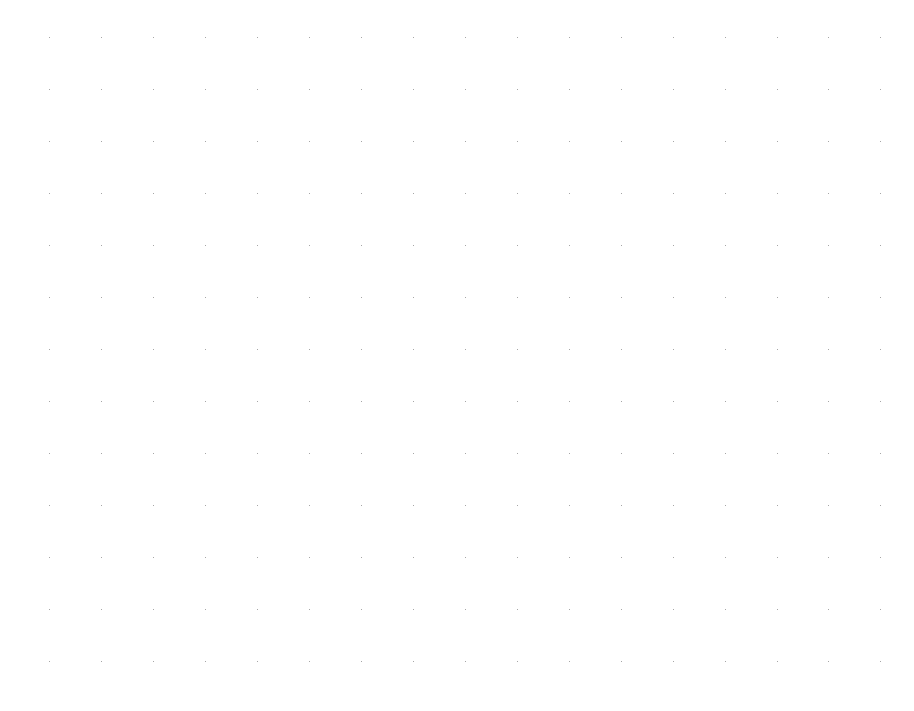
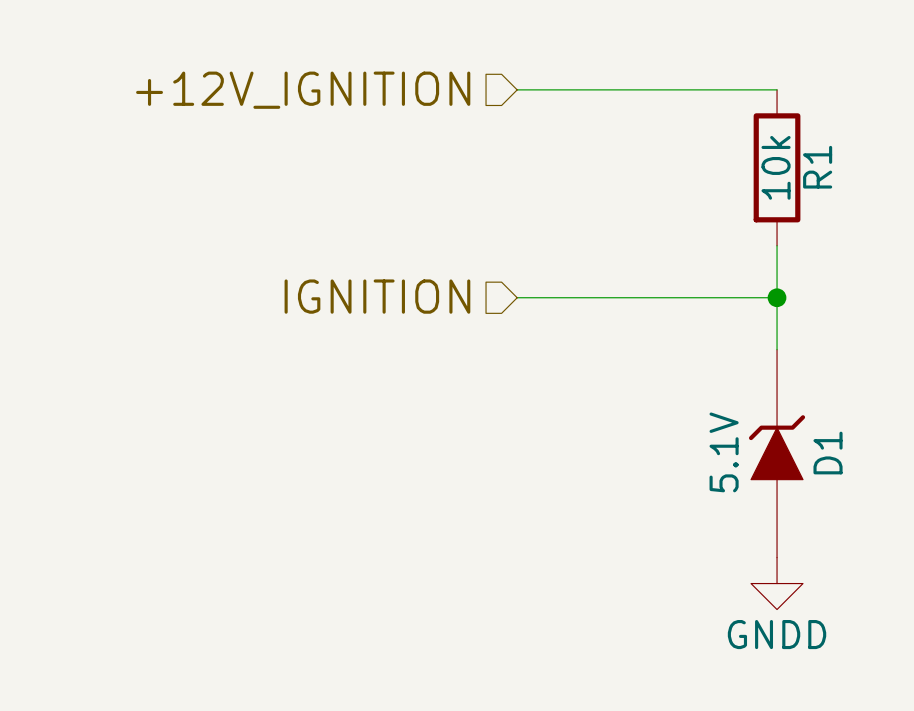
wire: none -> (517, 89) (777, 89)
hierarchical label: none -> +12V_IGNITION (303, 90)
R1: none -> 10k (777, 167)
wire: none -> (777, 245) (777, 349)
hierarchical label: none -> IGNITION (377, 296)
wire: none -> (517, 297) (777, 297)
junction: none -> (777, 297)
D1: none -> 5.1V (777, 453)
power symbol: none -> GNDD (777, 583)

